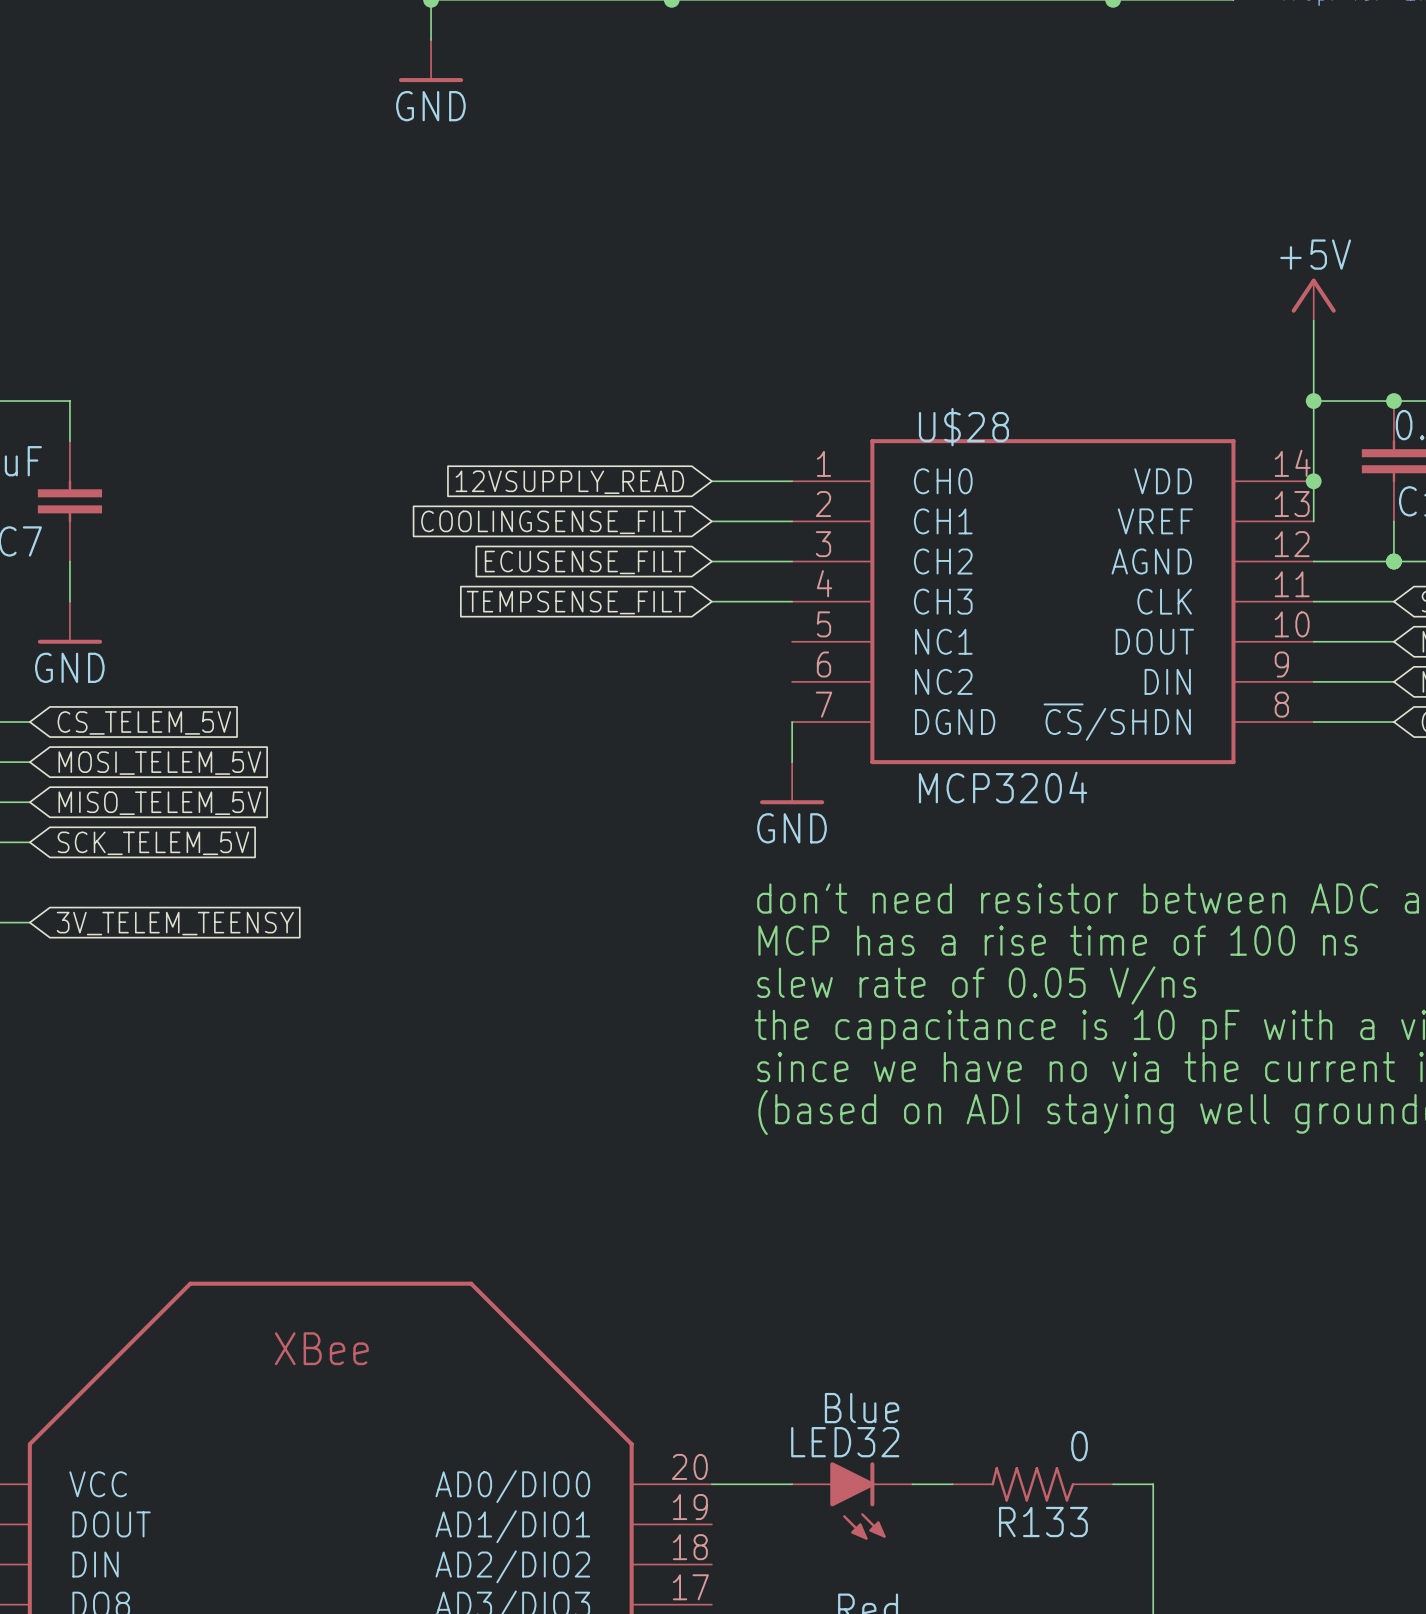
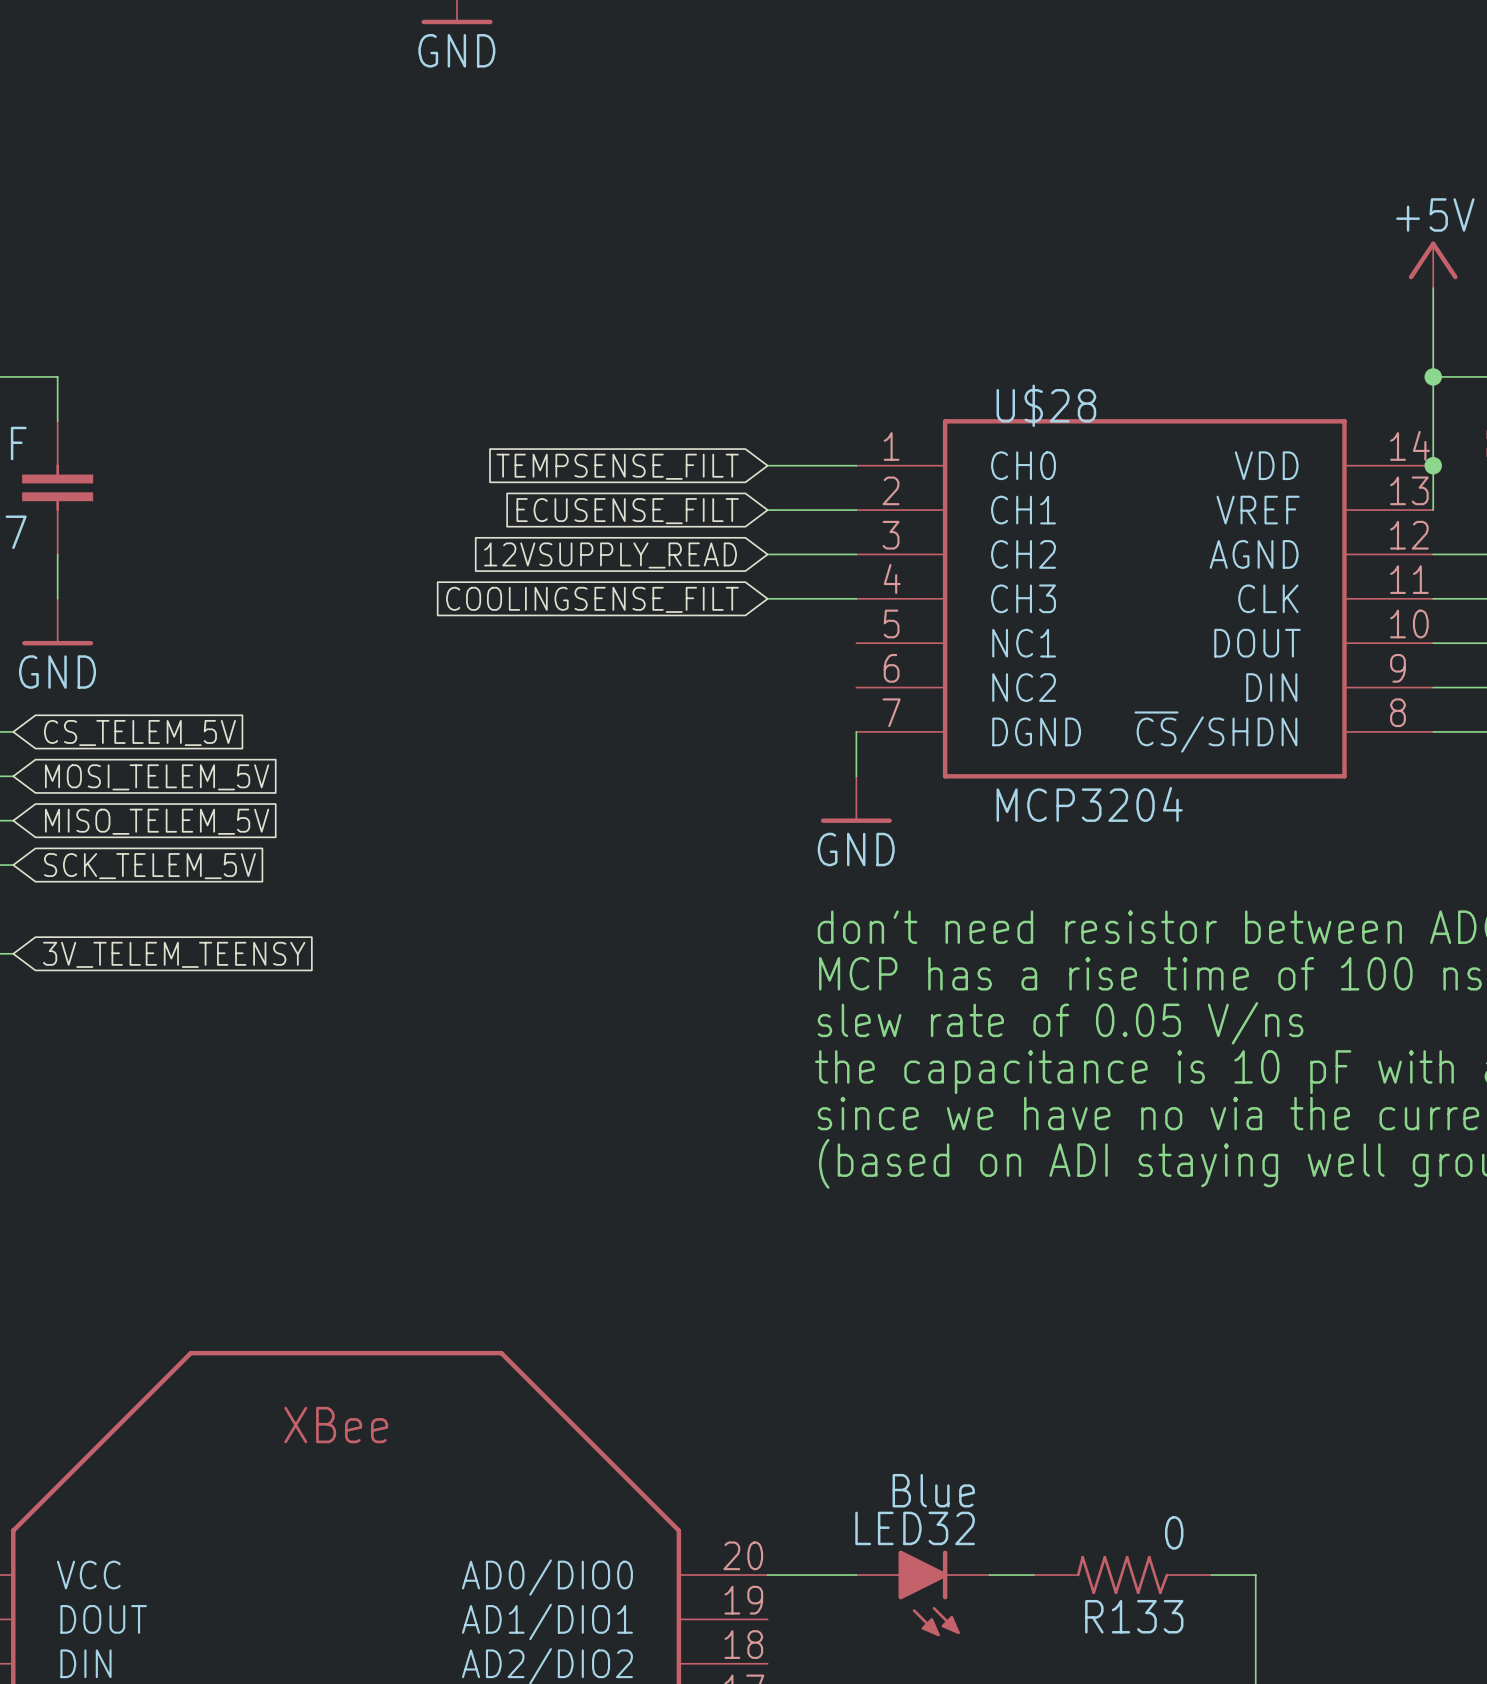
global label: 12VSUPPLY_READ (569, 482) -> TEMPSENSE_FILT (617, 466)
global label: COOLINGSENSE_FILT (553, 522) -> ECUSENSE_FILT (627, 511)
global label: ECUSENSE_FILT (585, 562) -> 12VSUPPLY_READ (610, 555)
global label: TEMPSENSE_FILT (576, 602) -> COOLINGSENSE_FILT (592, 599)

